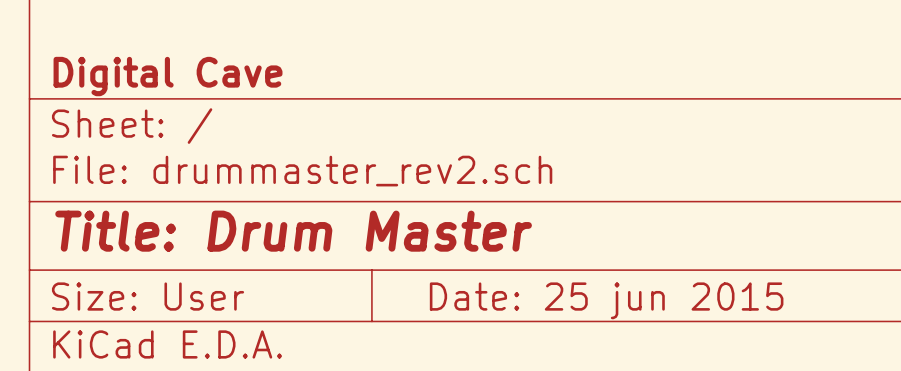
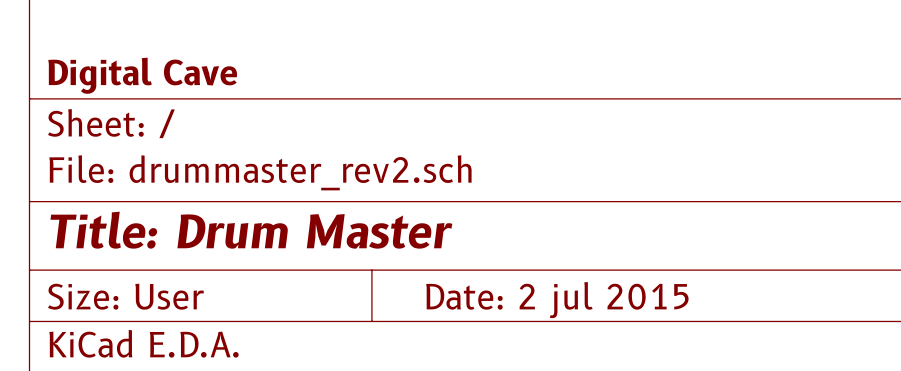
title block: Date: 25 jun 2015 (606, 300) -> Date: 2 jul 2015 (557, 300)

